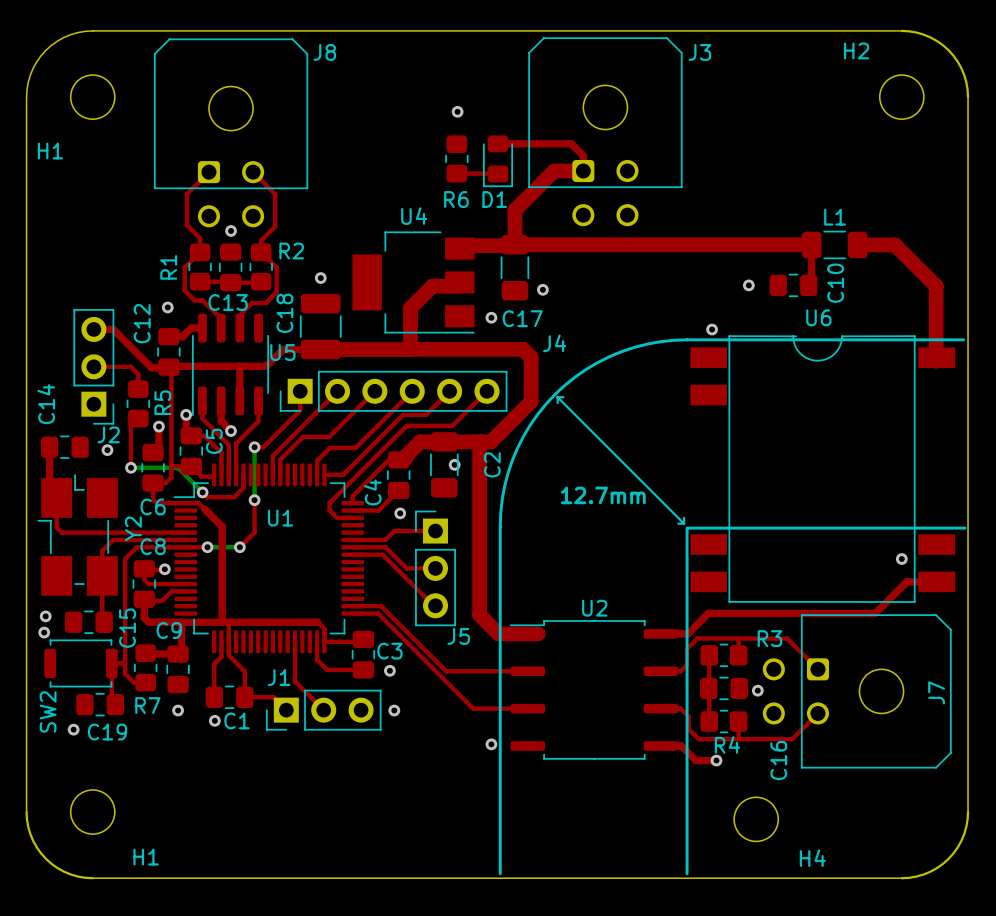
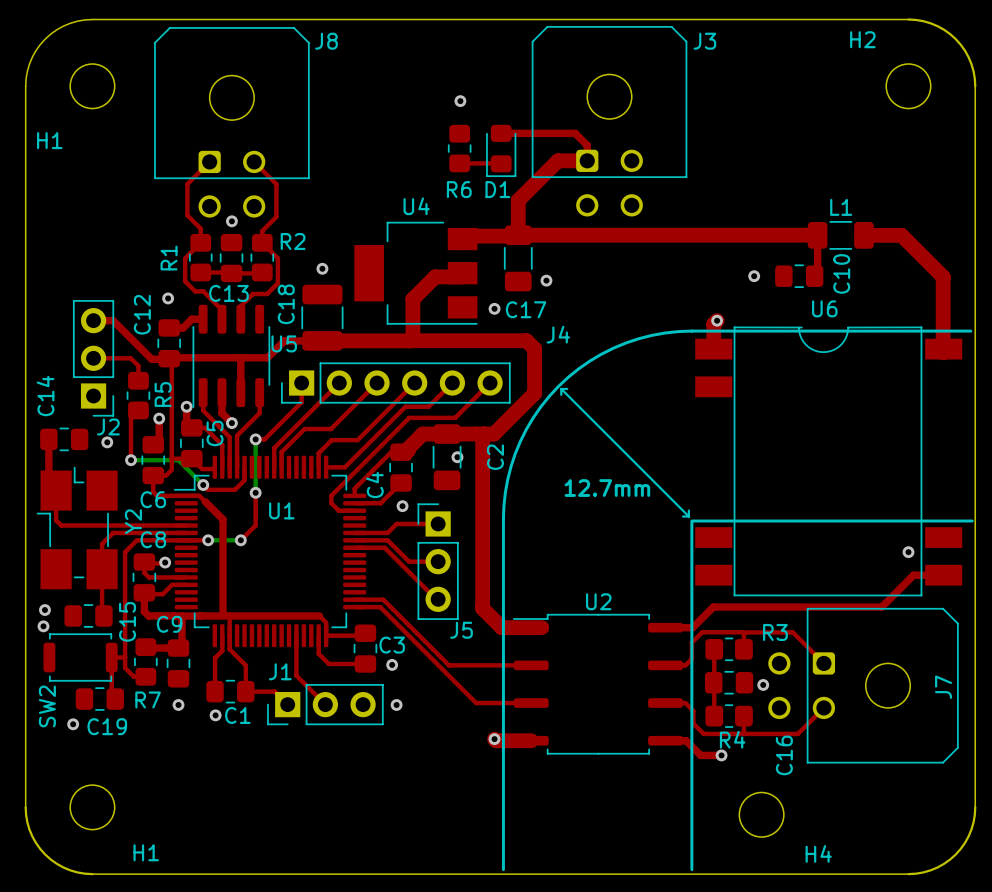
top track: none -> (717, 320) (713, 324) (713, 349)
top track: none -> (494, 739) (496, 740) (531, 740)

